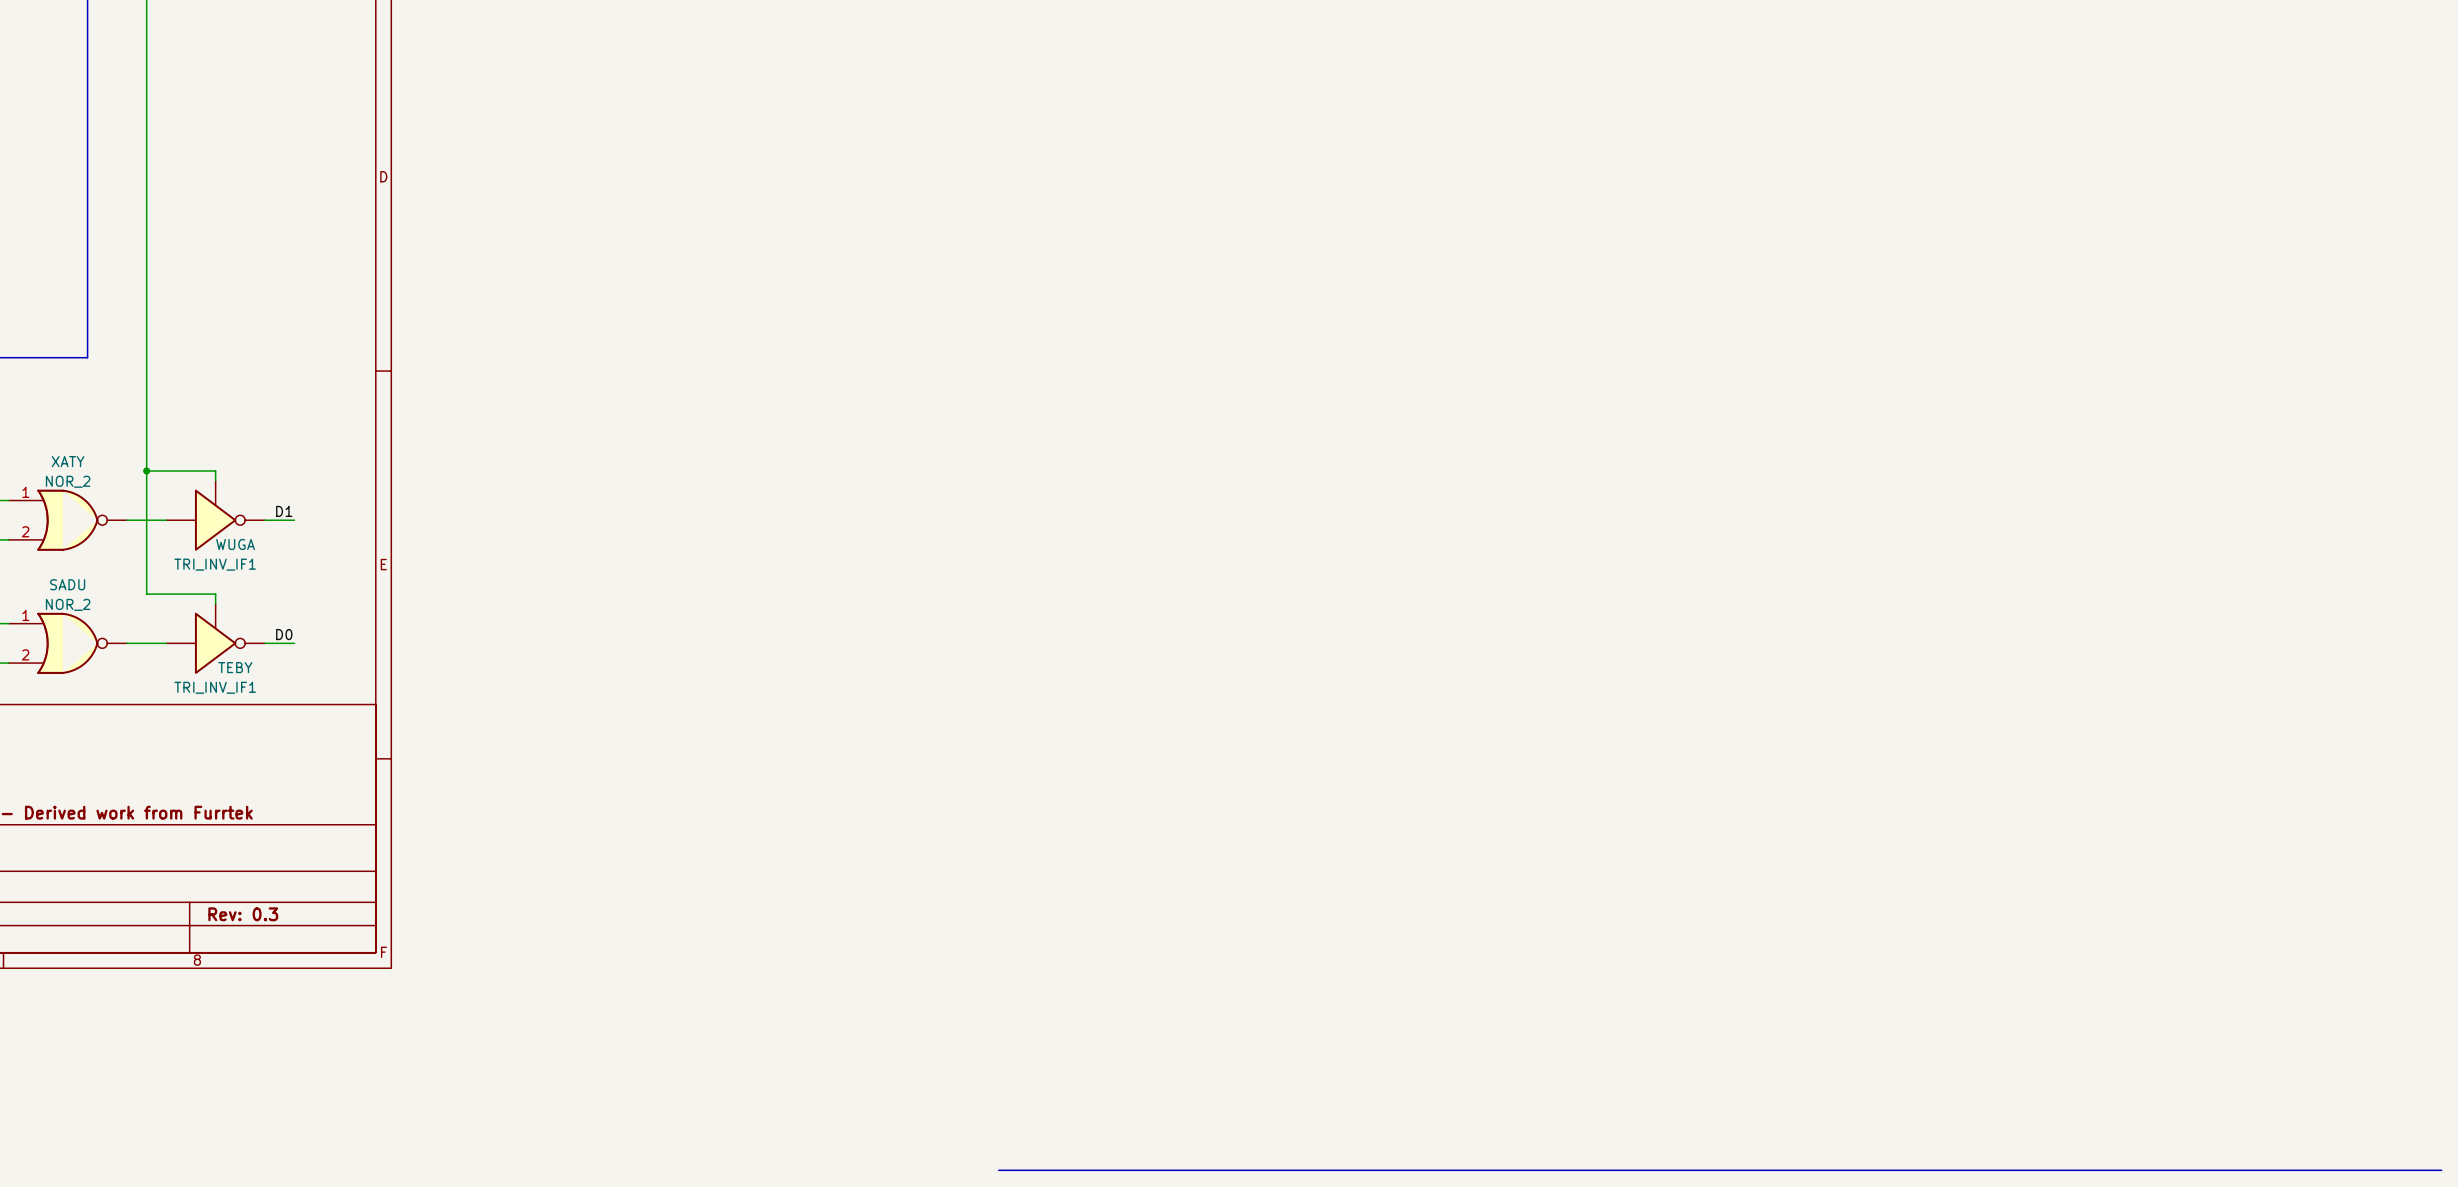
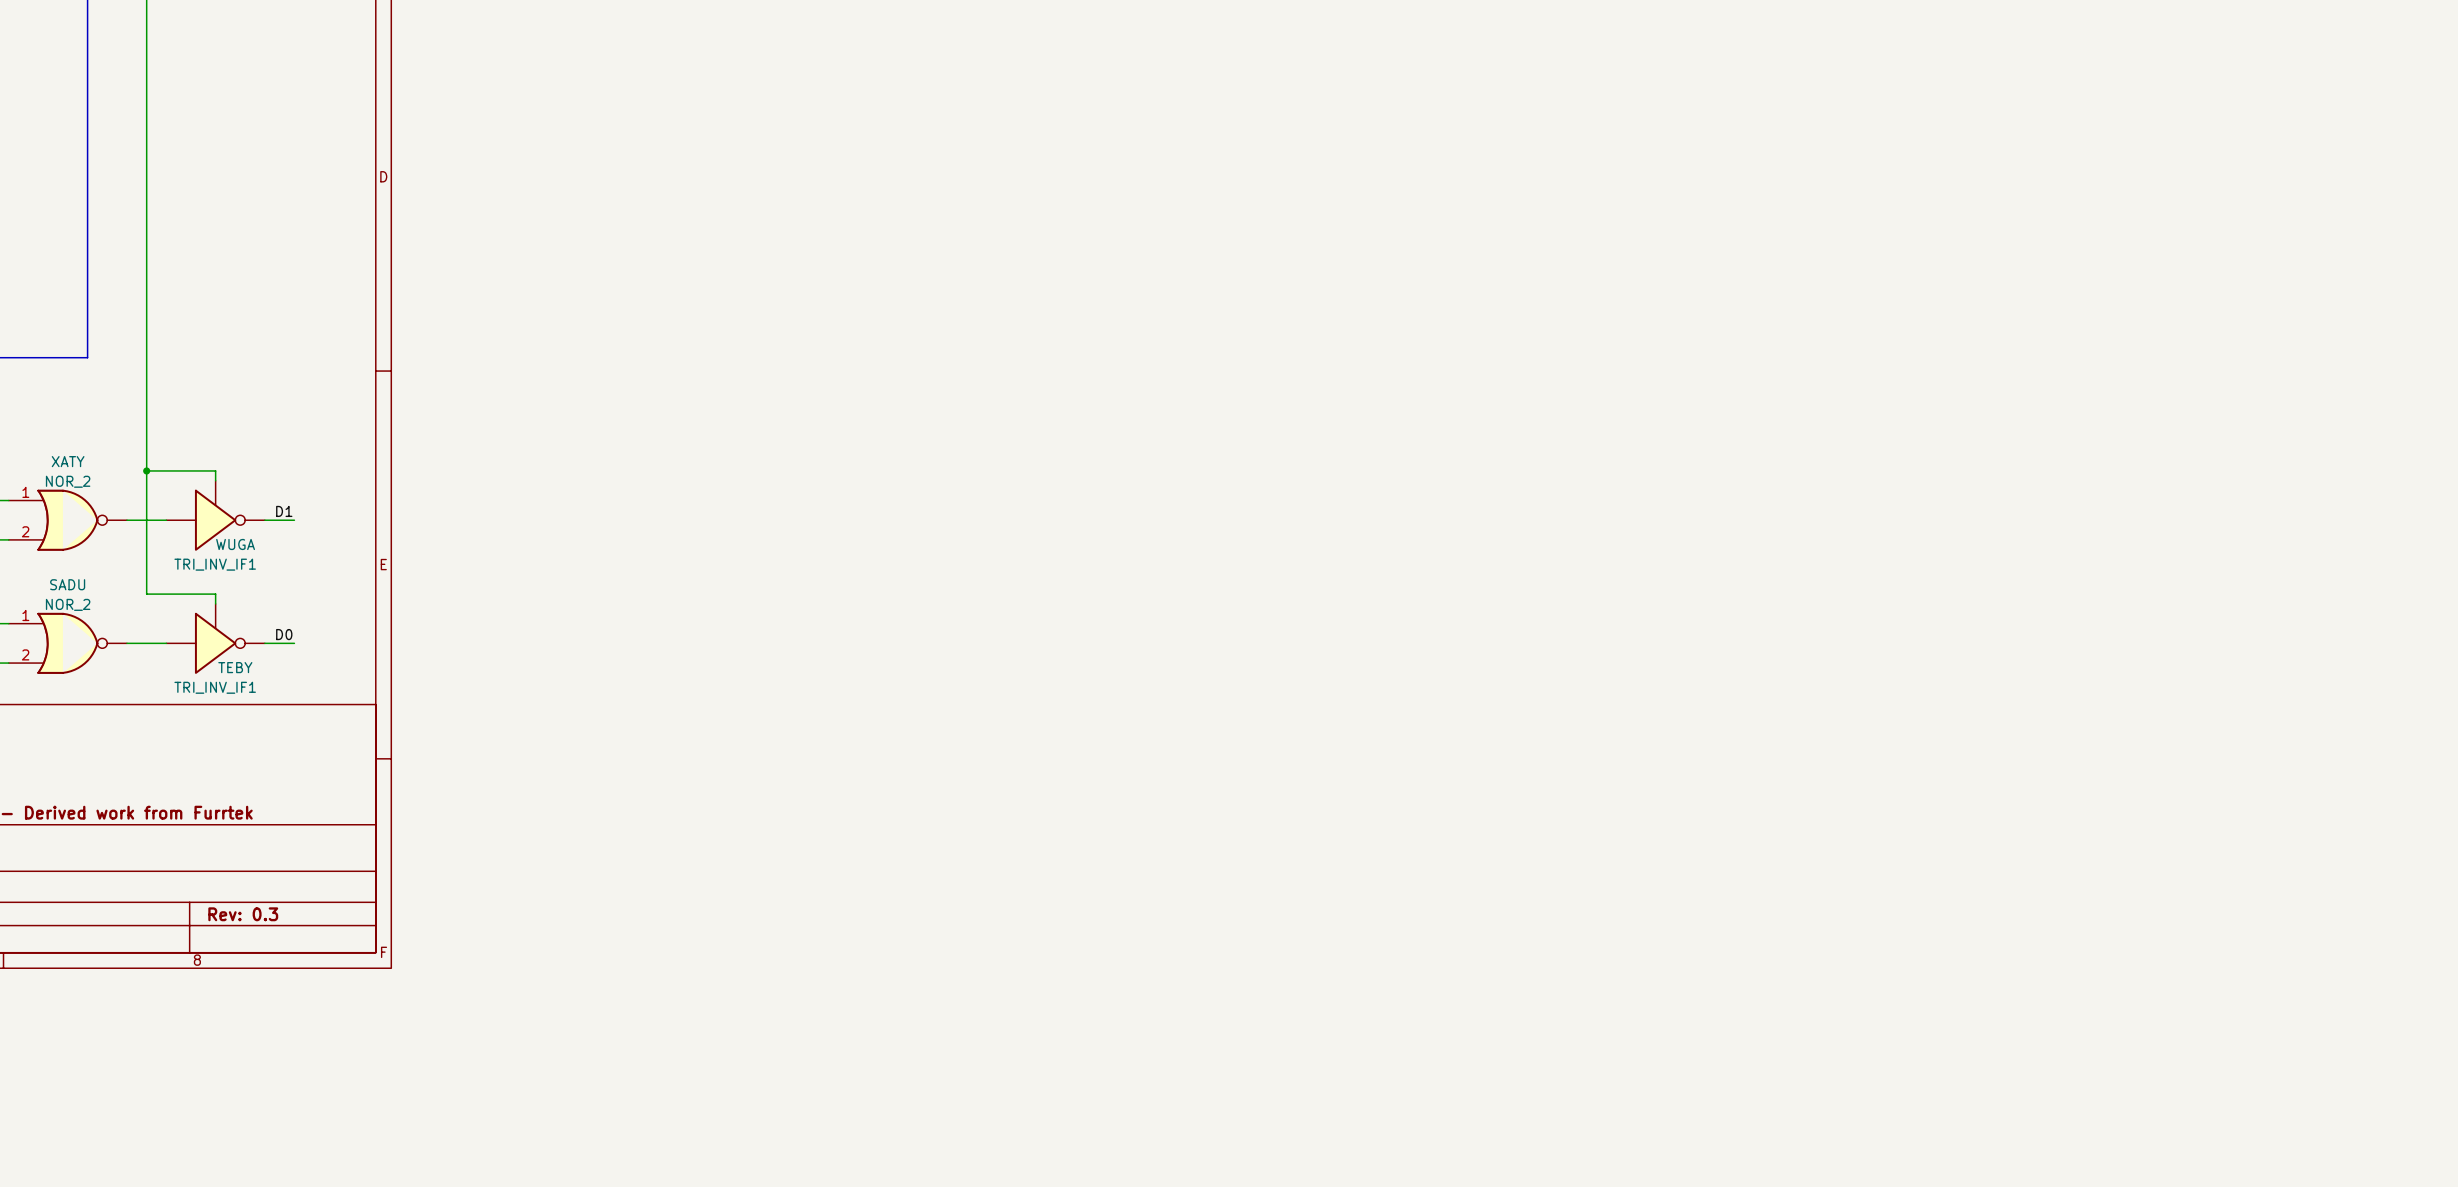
line: (998, 1170) (2441, 1170) -> none

